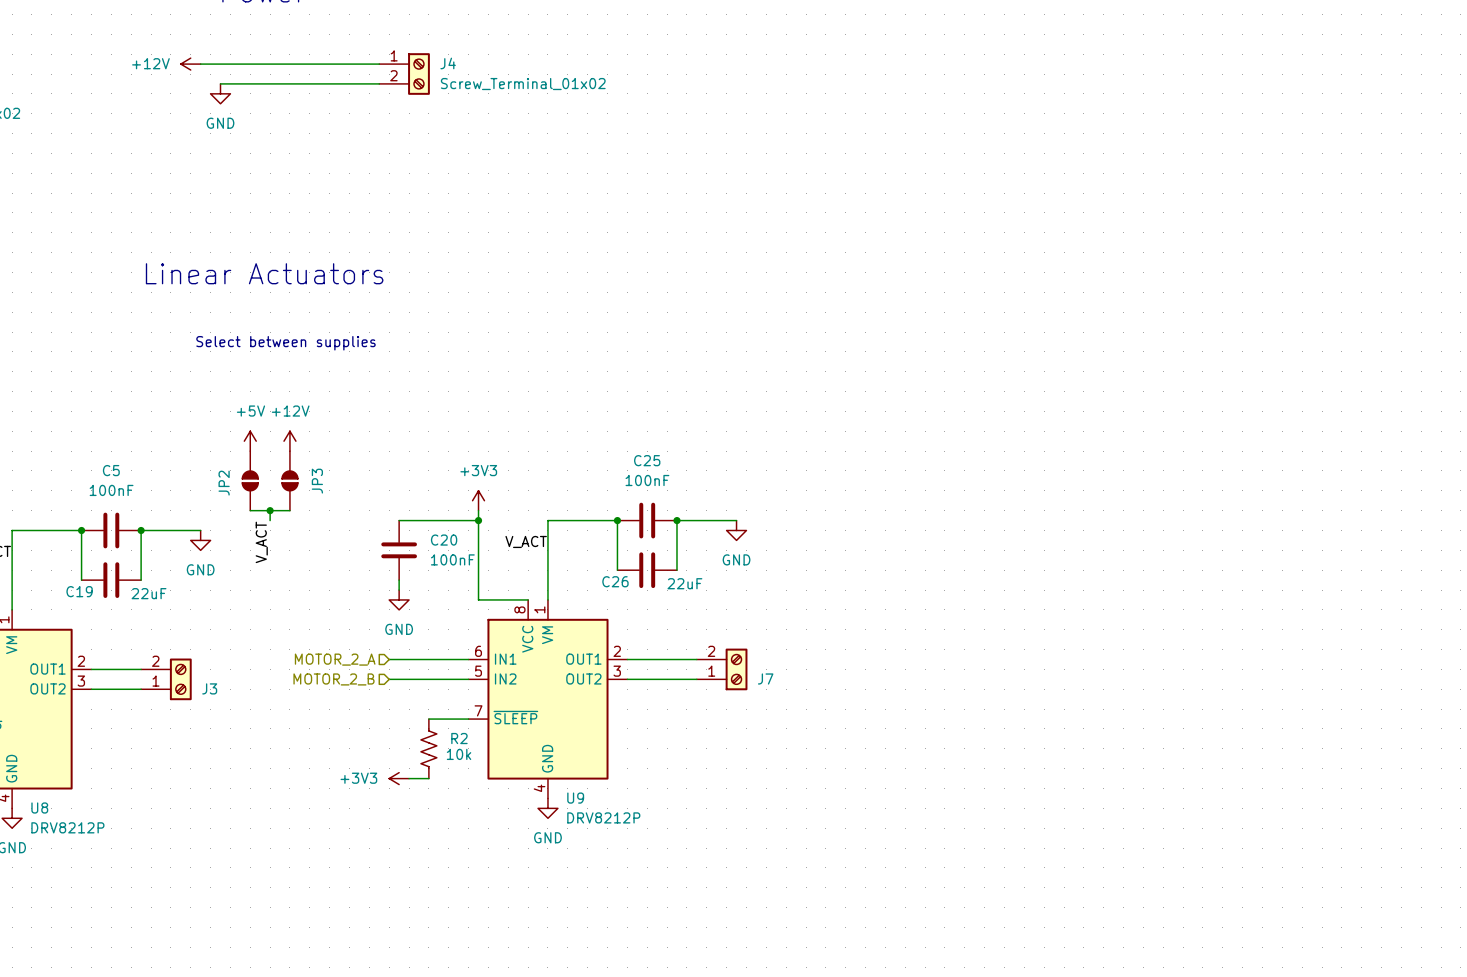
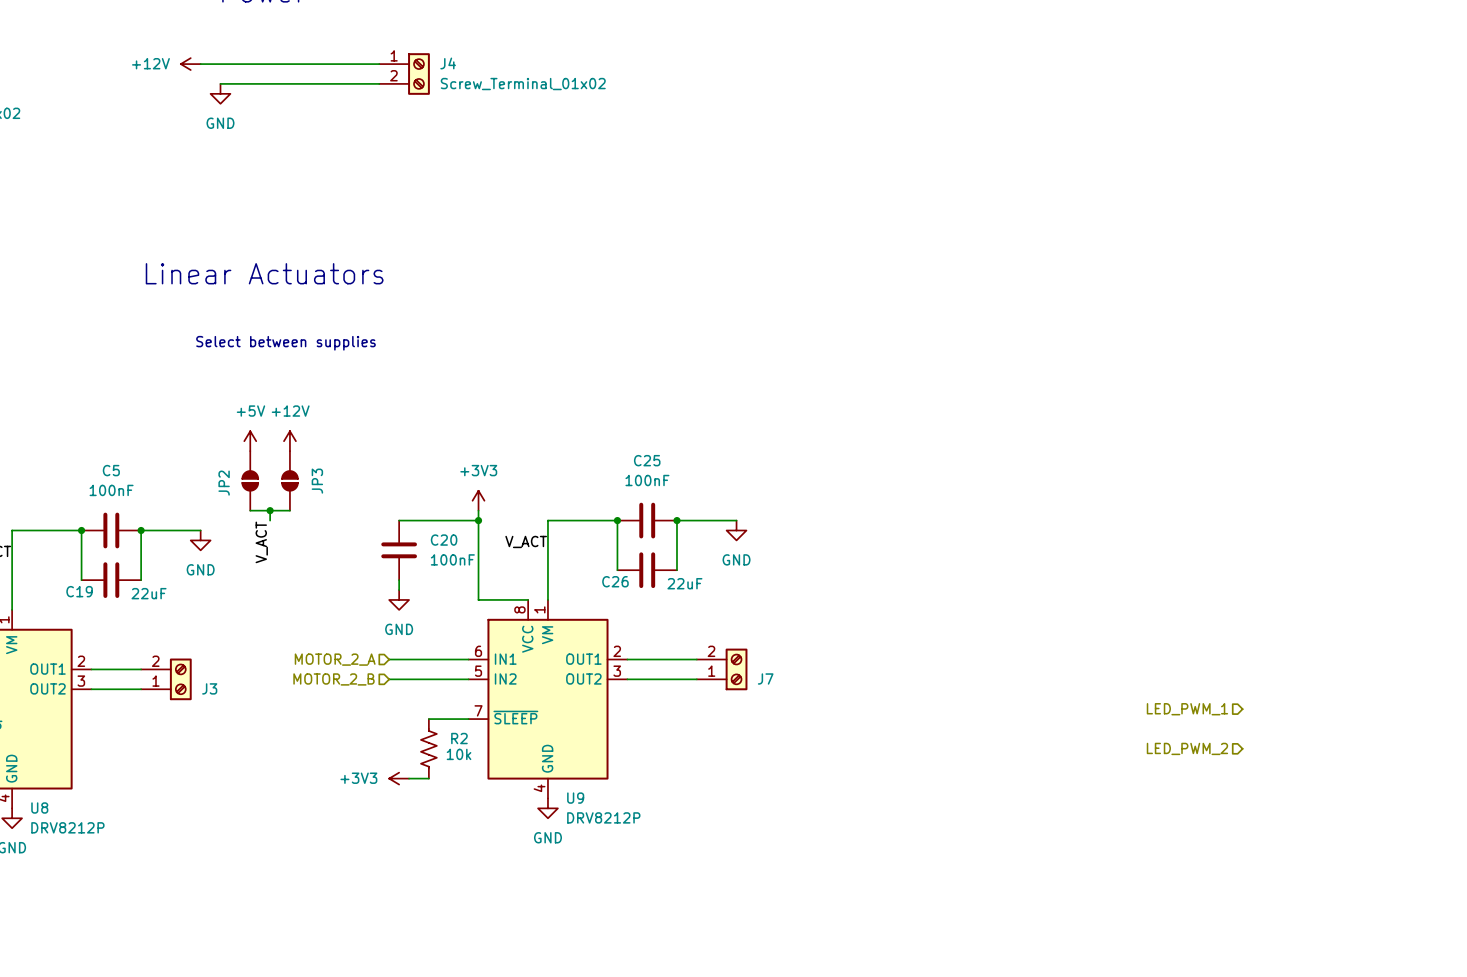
hierarchical label: none -> LED_PWM_1 (1187, 709)
hierarchical label: none -> LED_PWM_2 (1187, 748)

